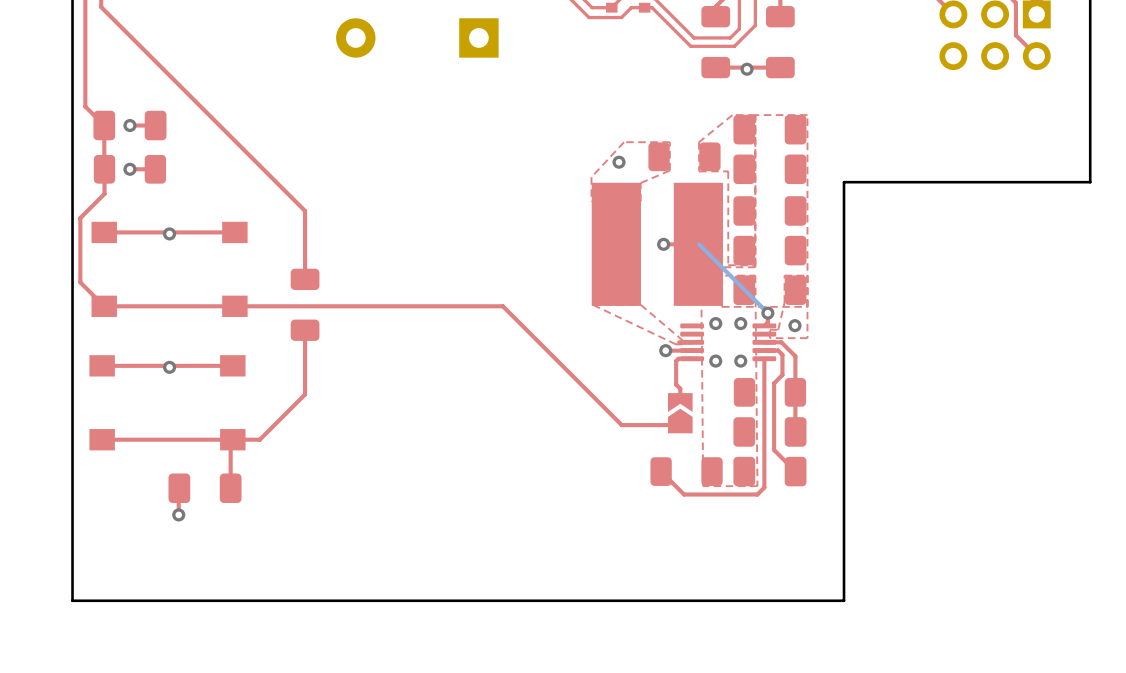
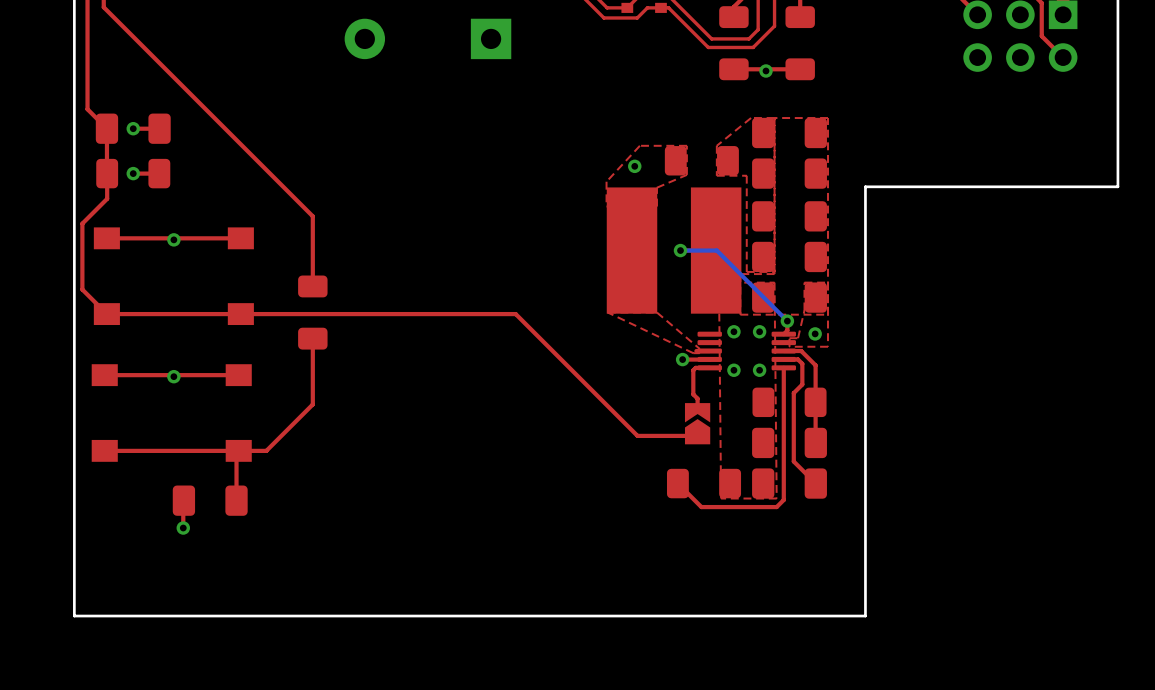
bottom track: none -> (716, 250) (680, 250)

